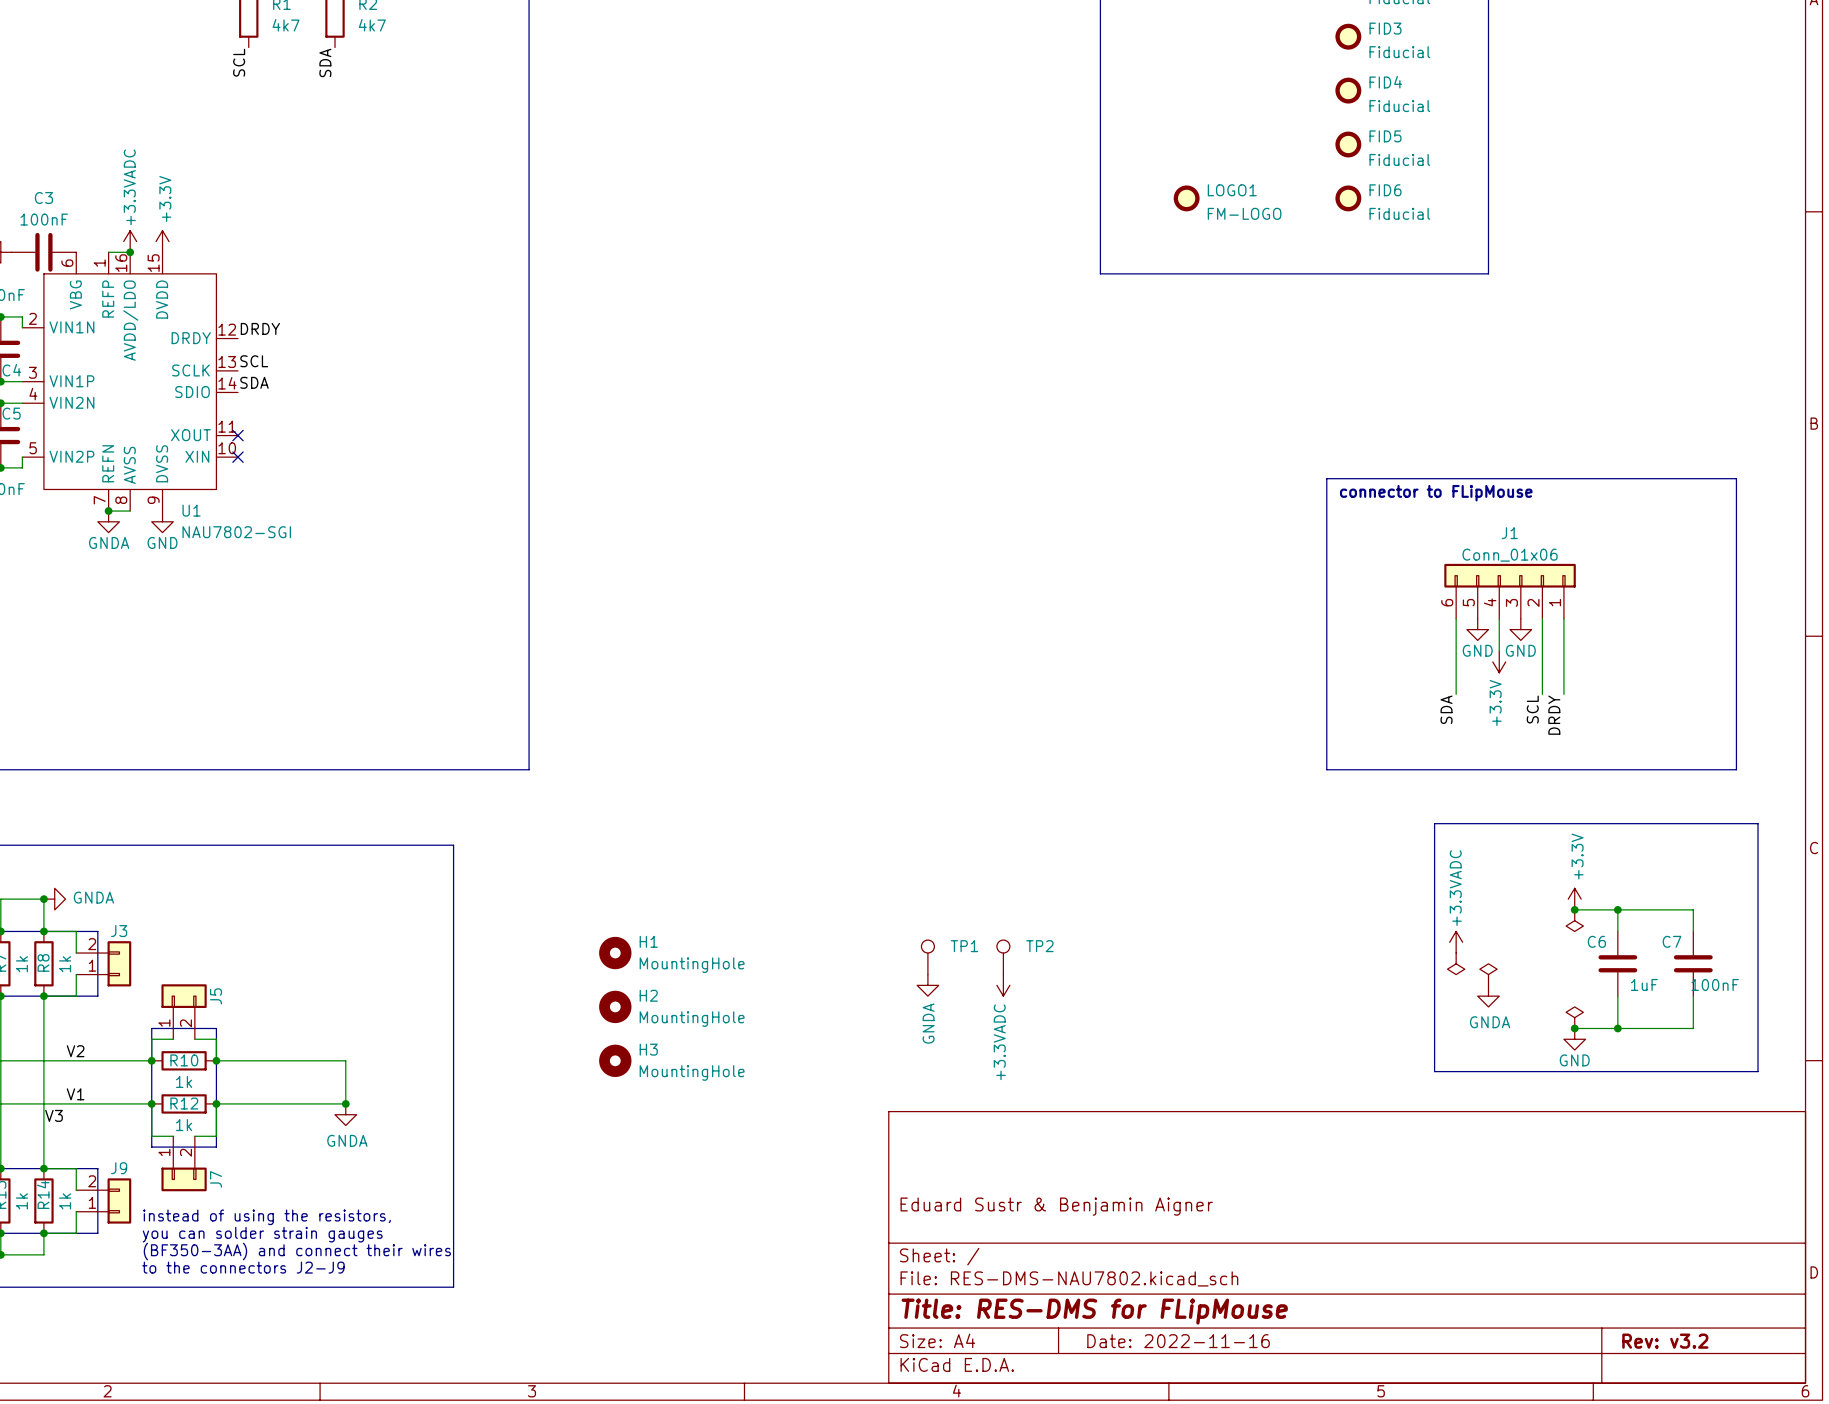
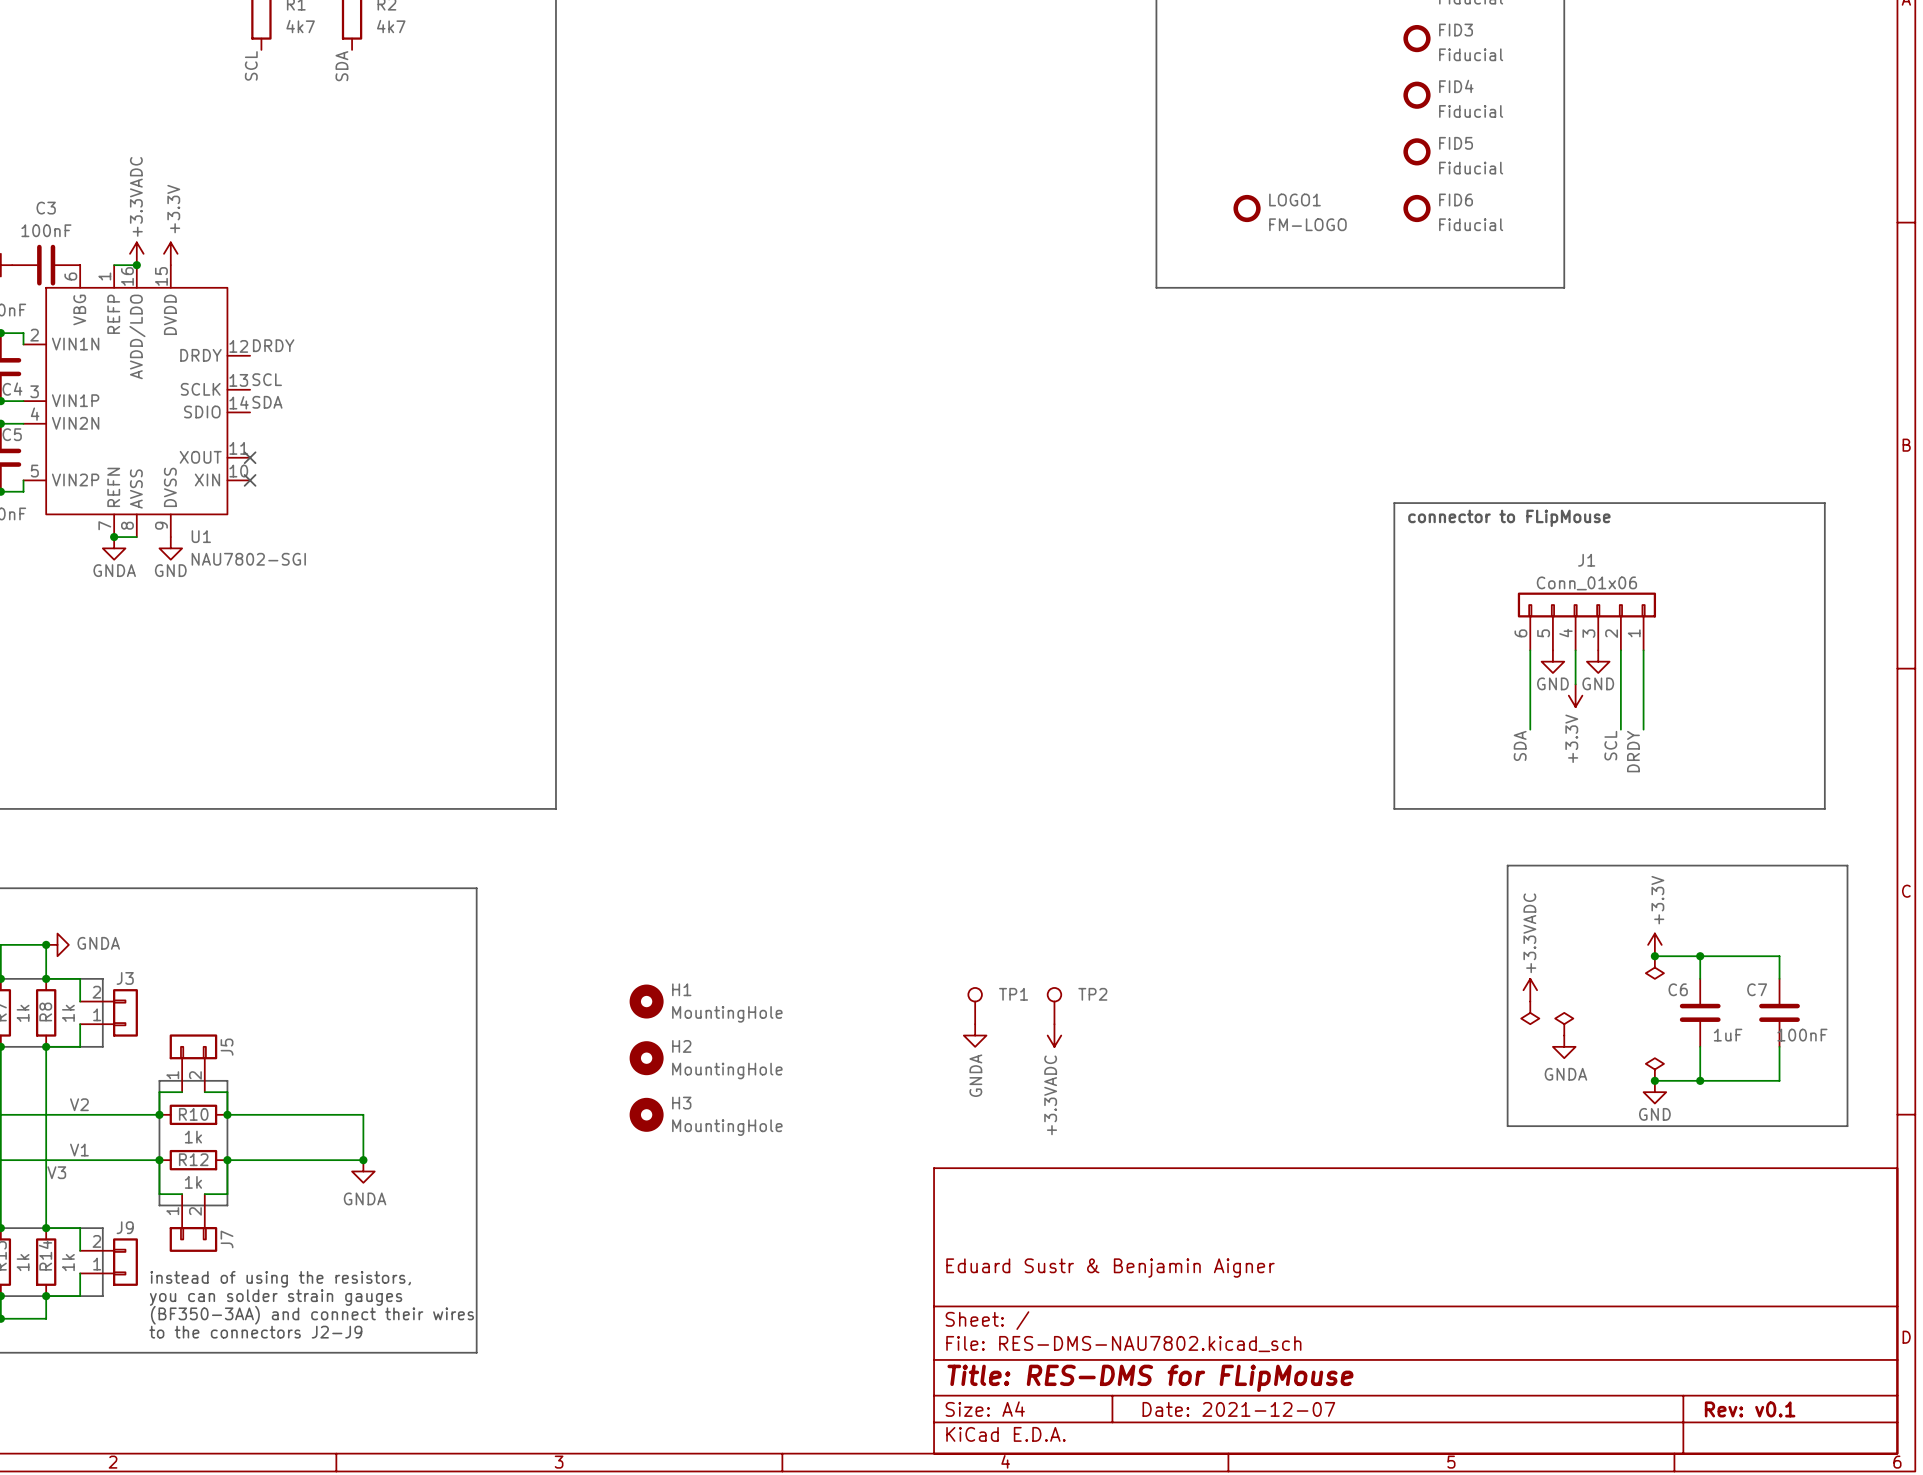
title block: Date: 2022-11-16 (1178, 1341) -> Date: 2021-12-07 (1238, 1409)
title block: Rev: v3.2 (1665, 1341) -> Rev: v0.1 (1750, 1409)

